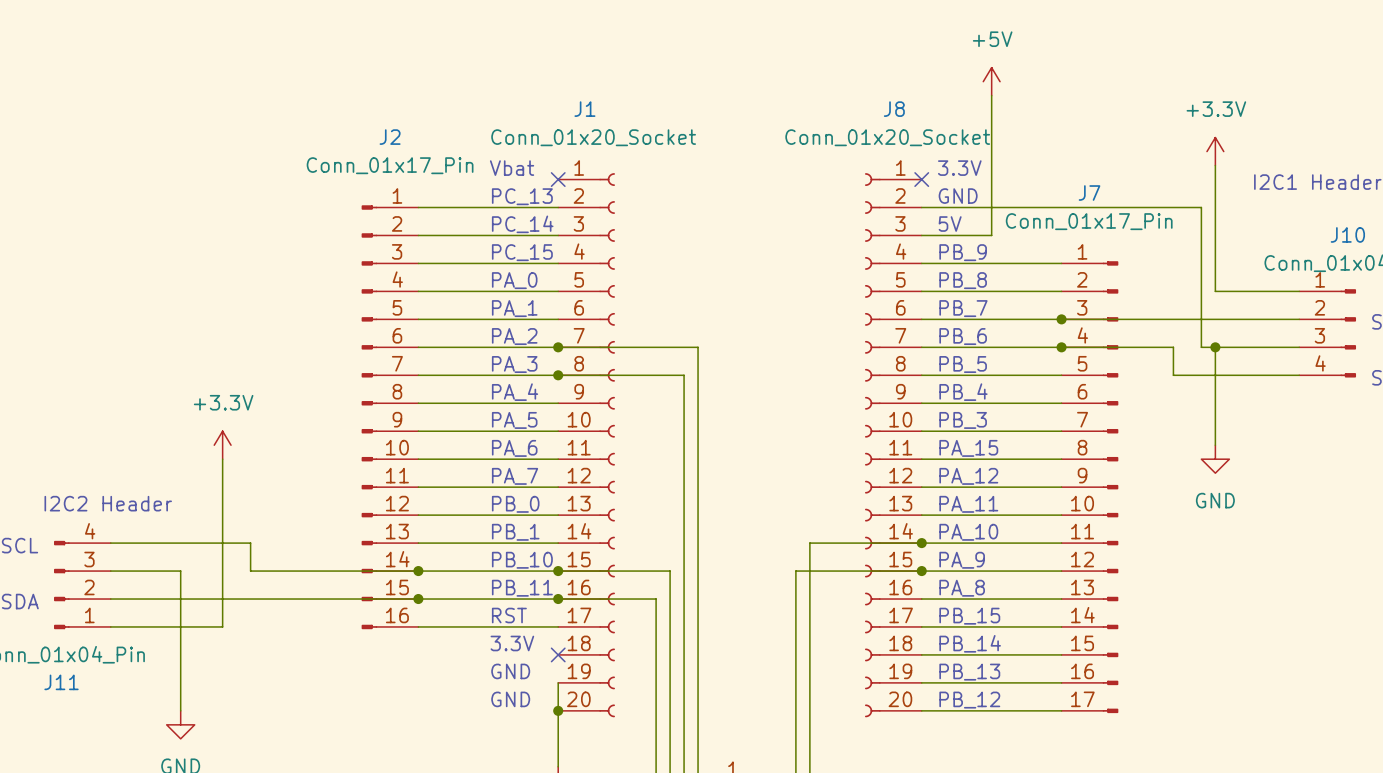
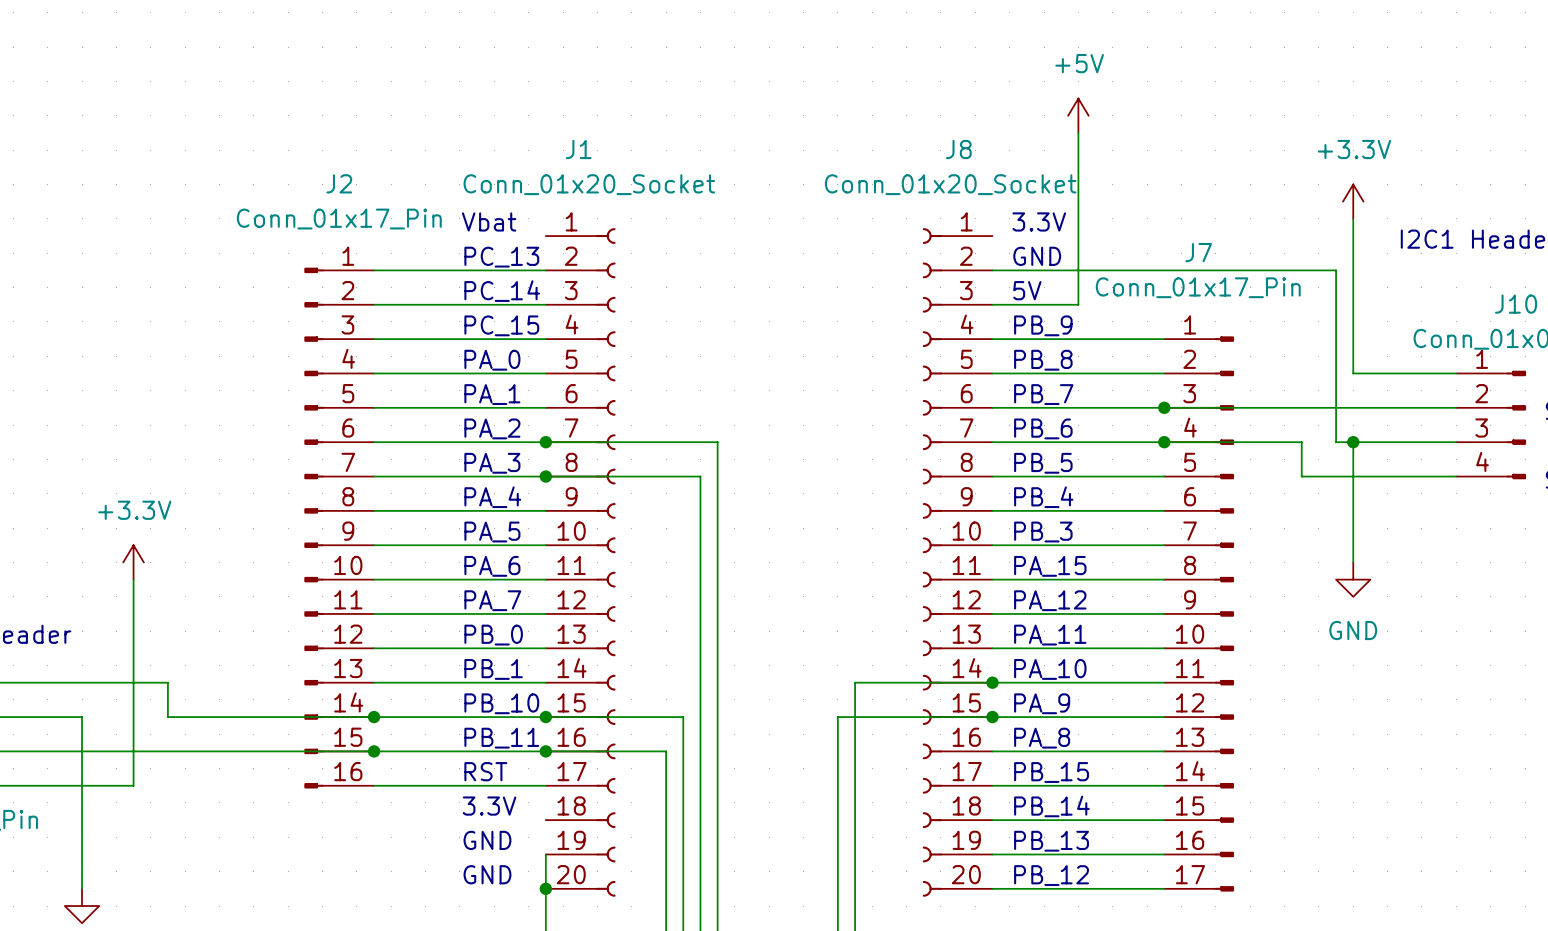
no-connect mark: (558, 179) -> none
no-connect mark: (921, 179) -> none
no-connect mark: (558, 654) -> none

